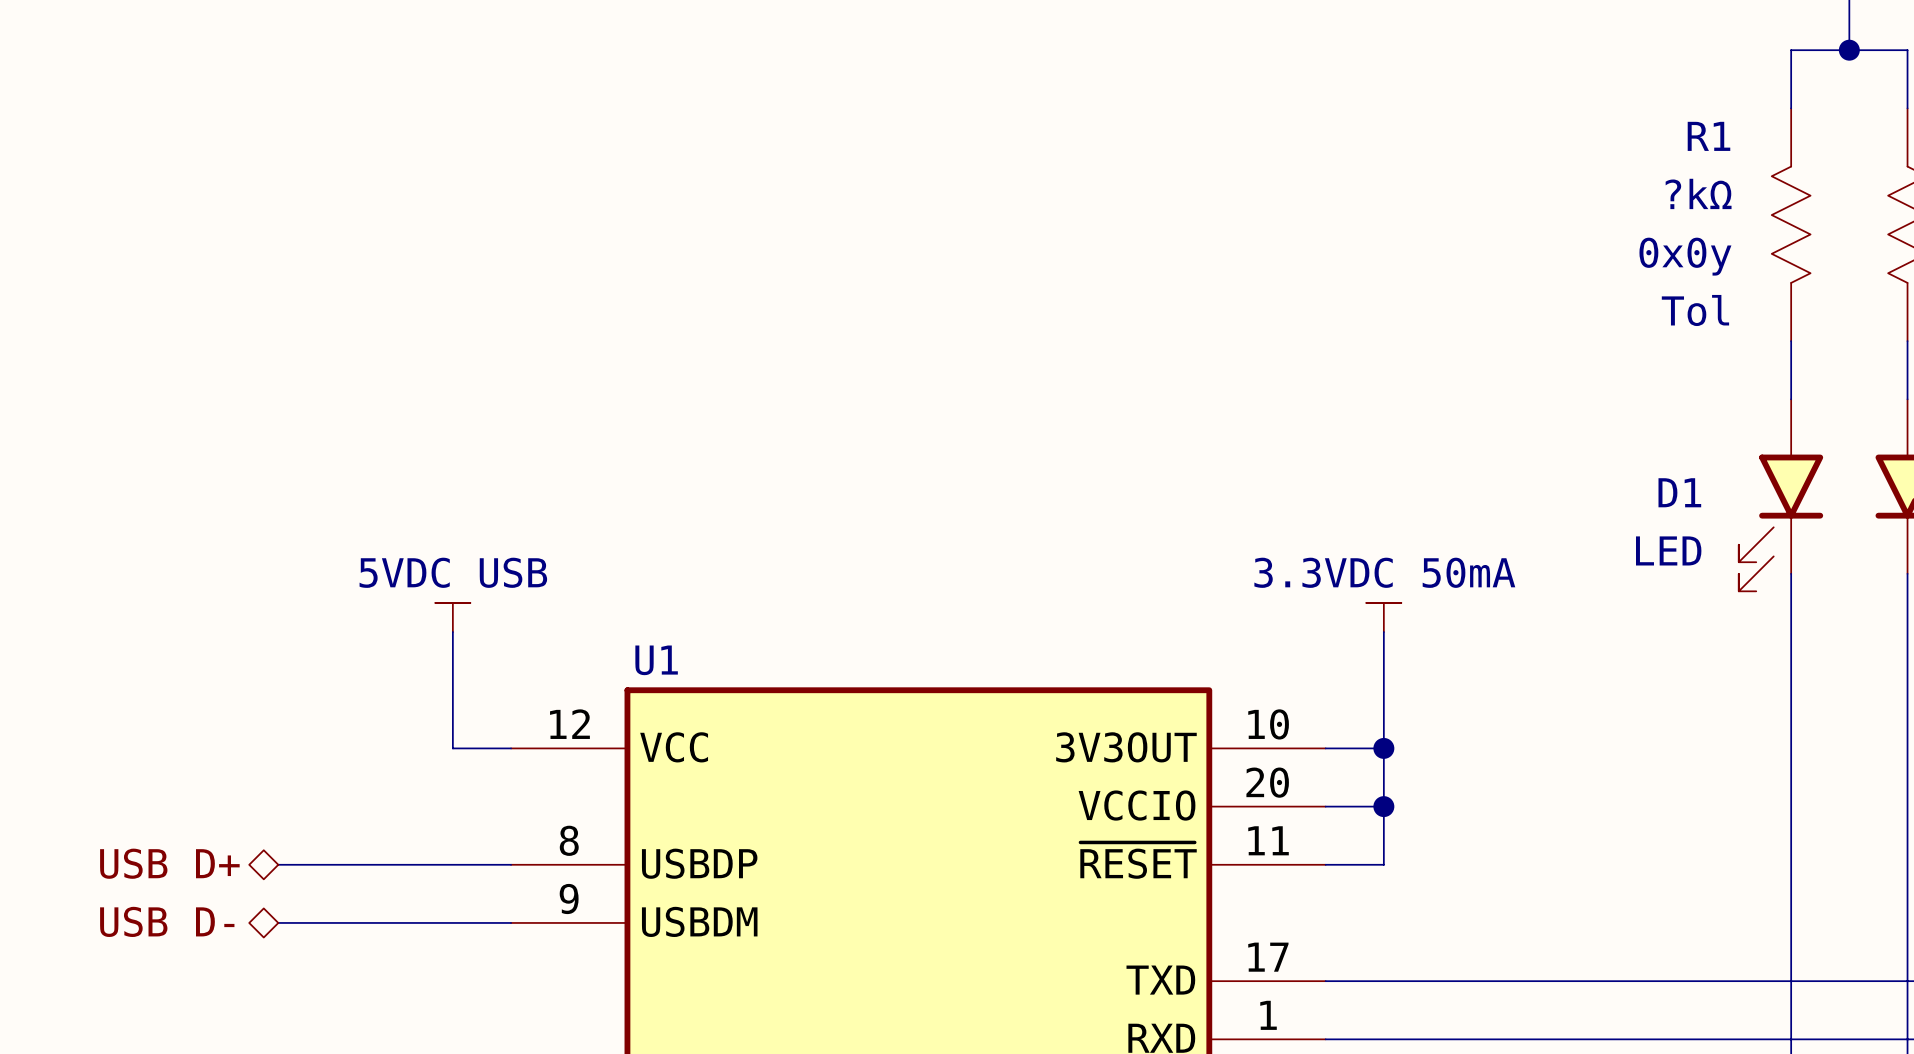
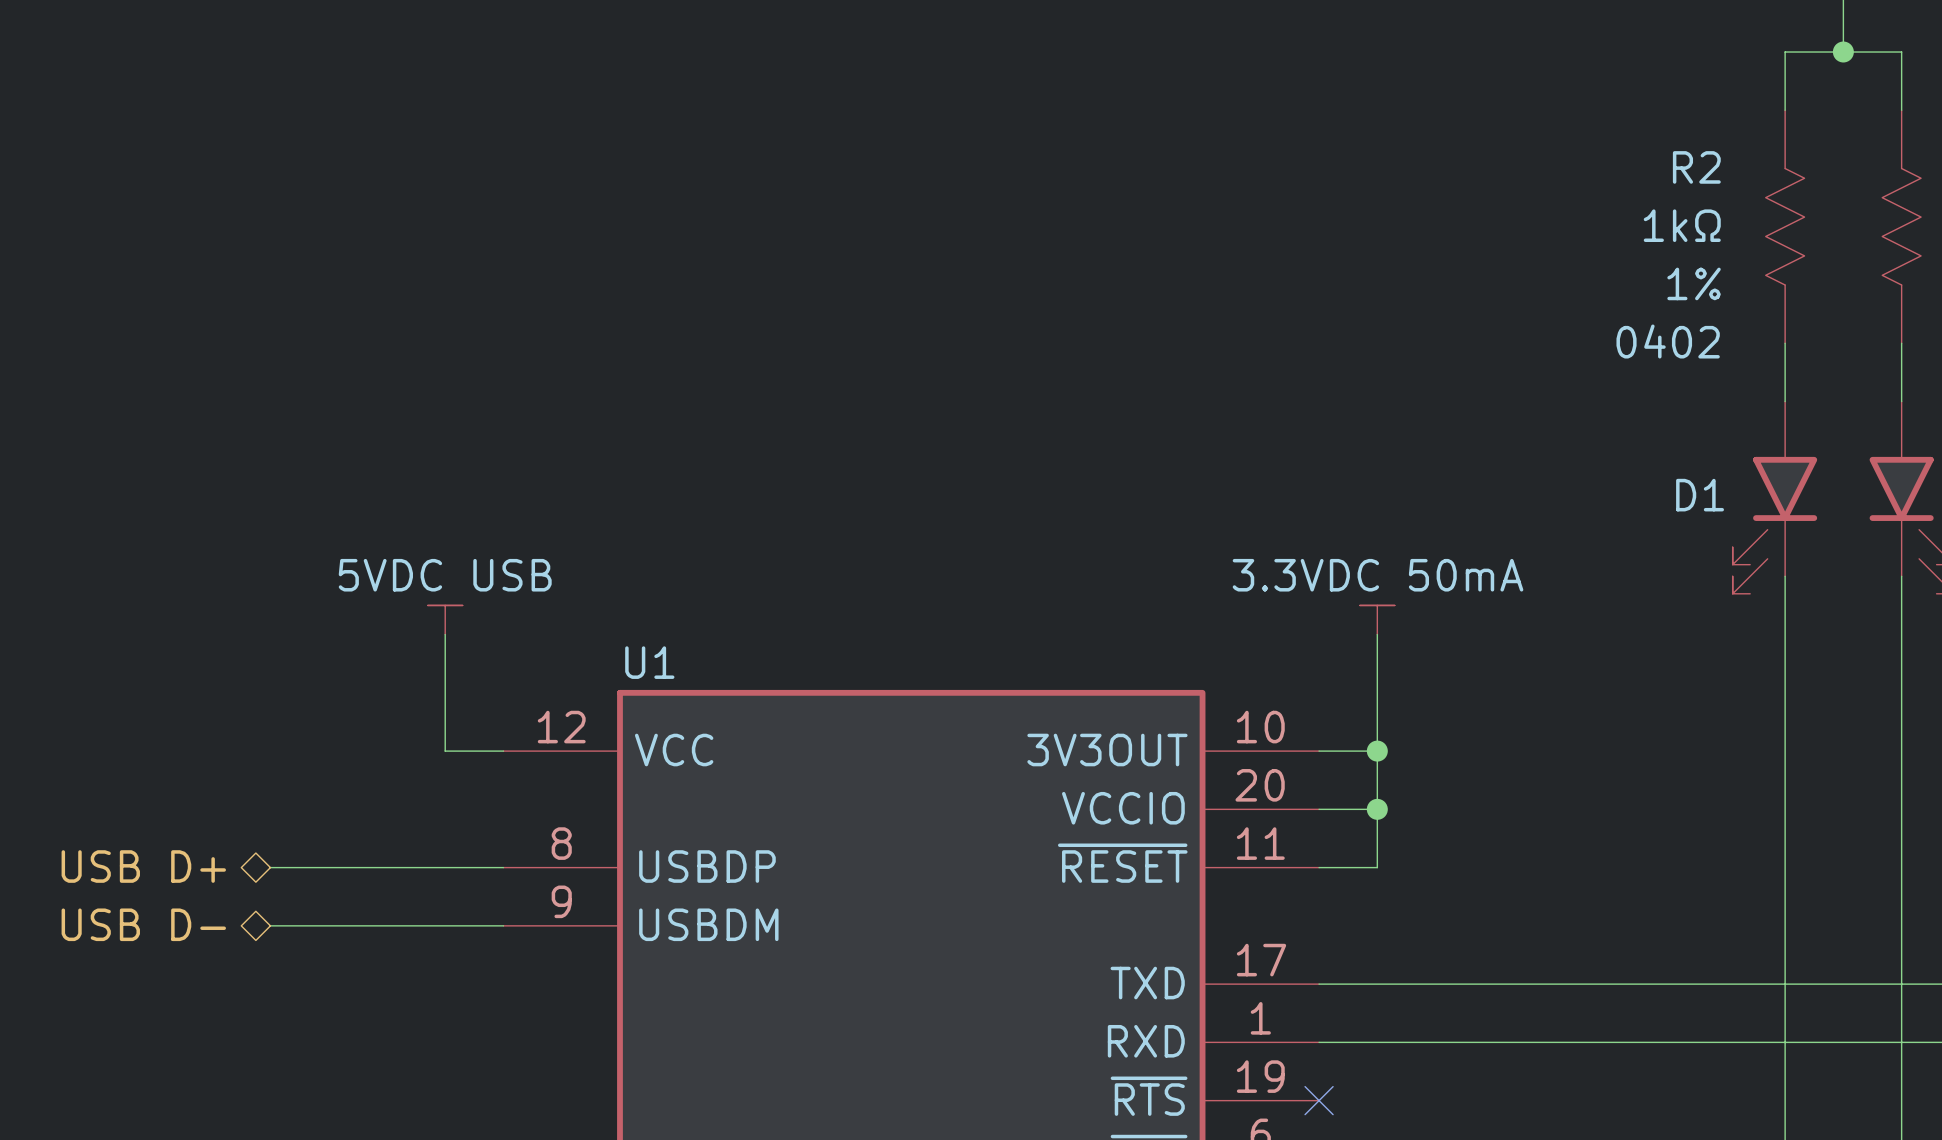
R1: (1791, 224) -> none
R2: none -> (1785, 226)
D1 name position: D1 (1679, 492) -> D1 (1700, 495)
D1 value: LED (1668, 550) -> none

